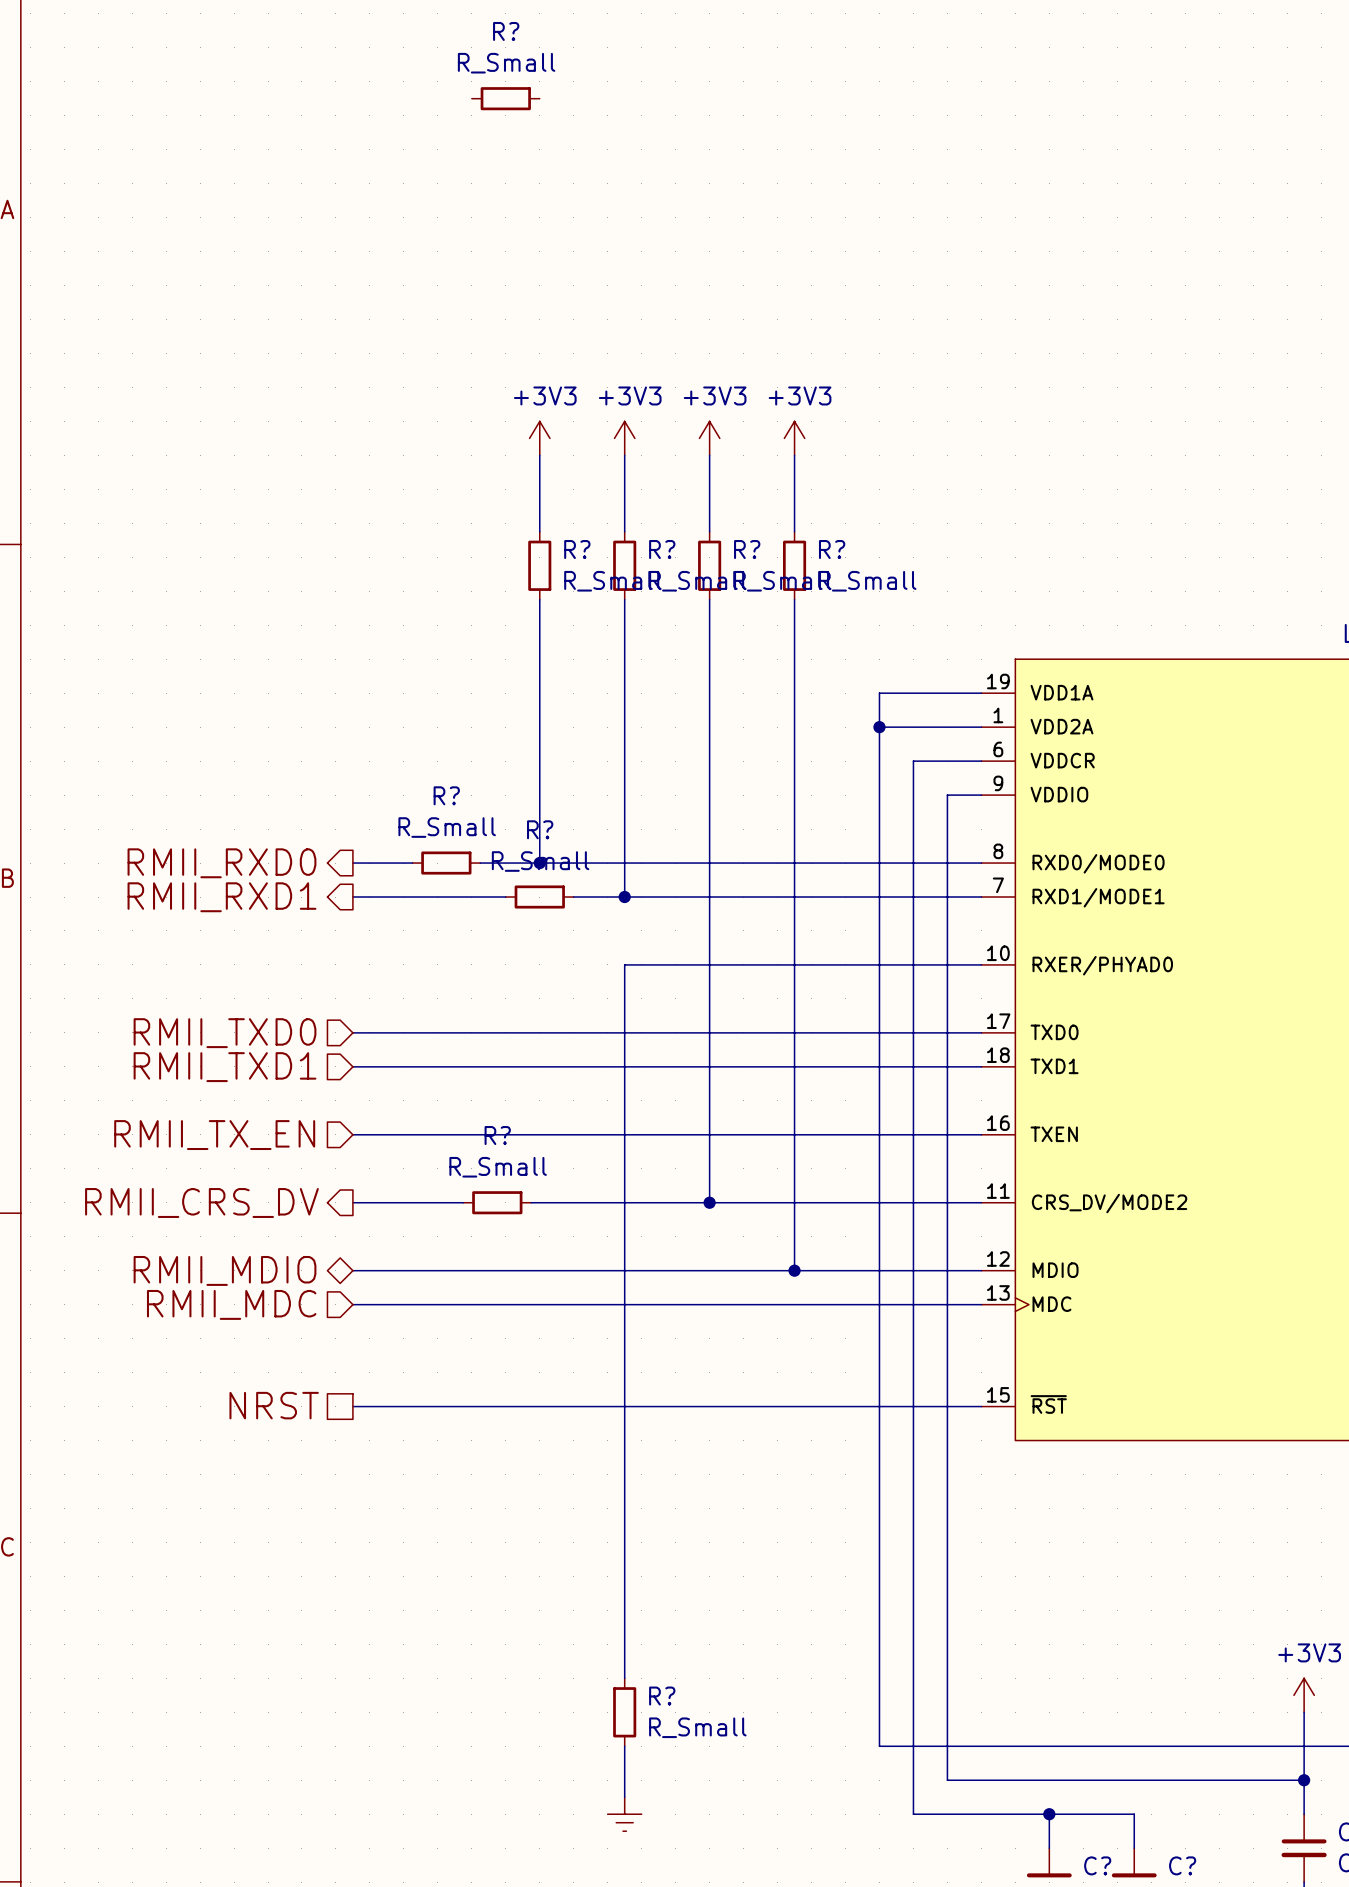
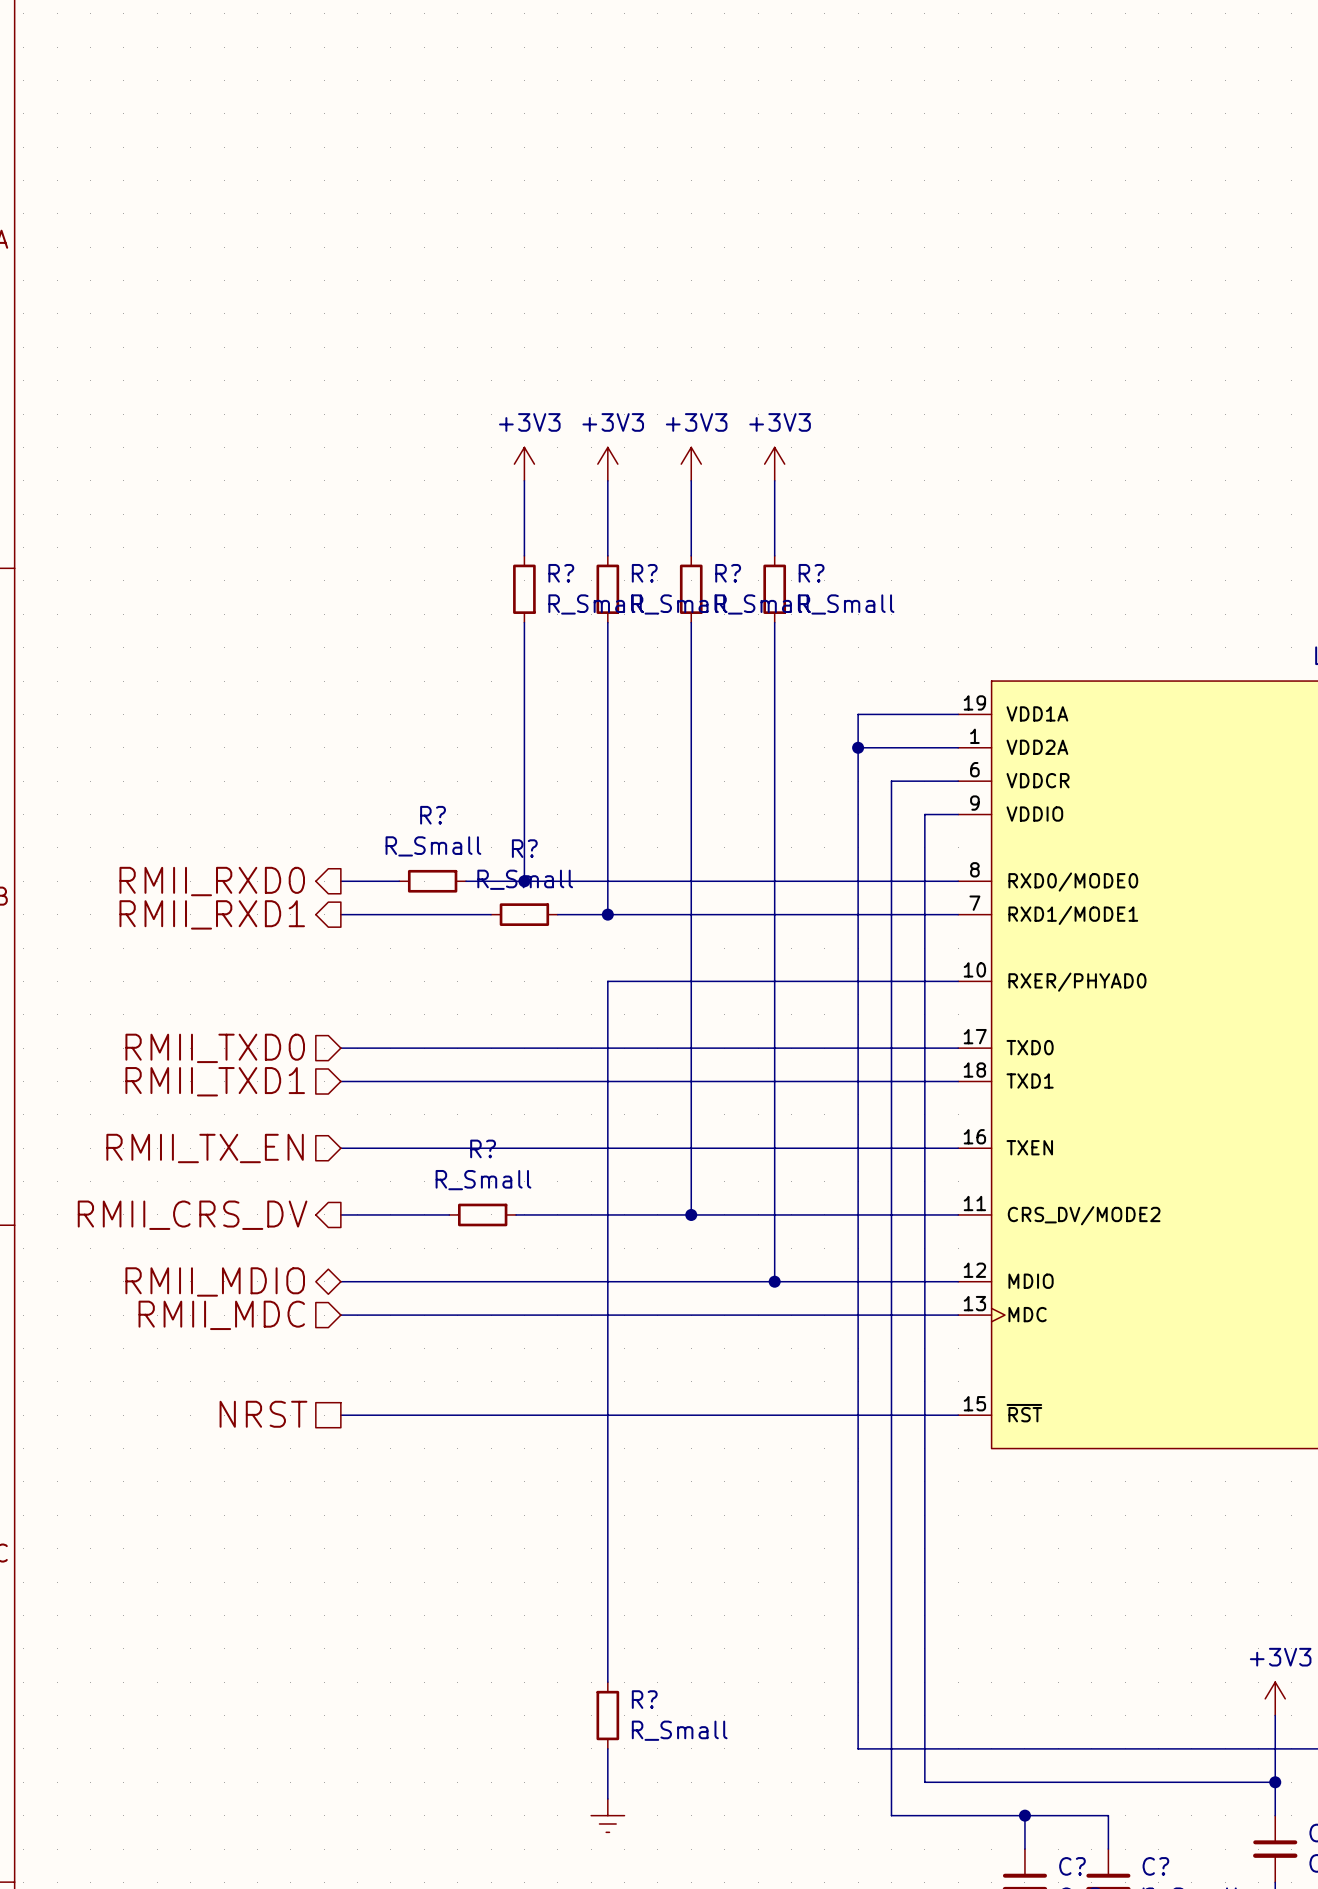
R?: R_Small (505, 98) -> none

